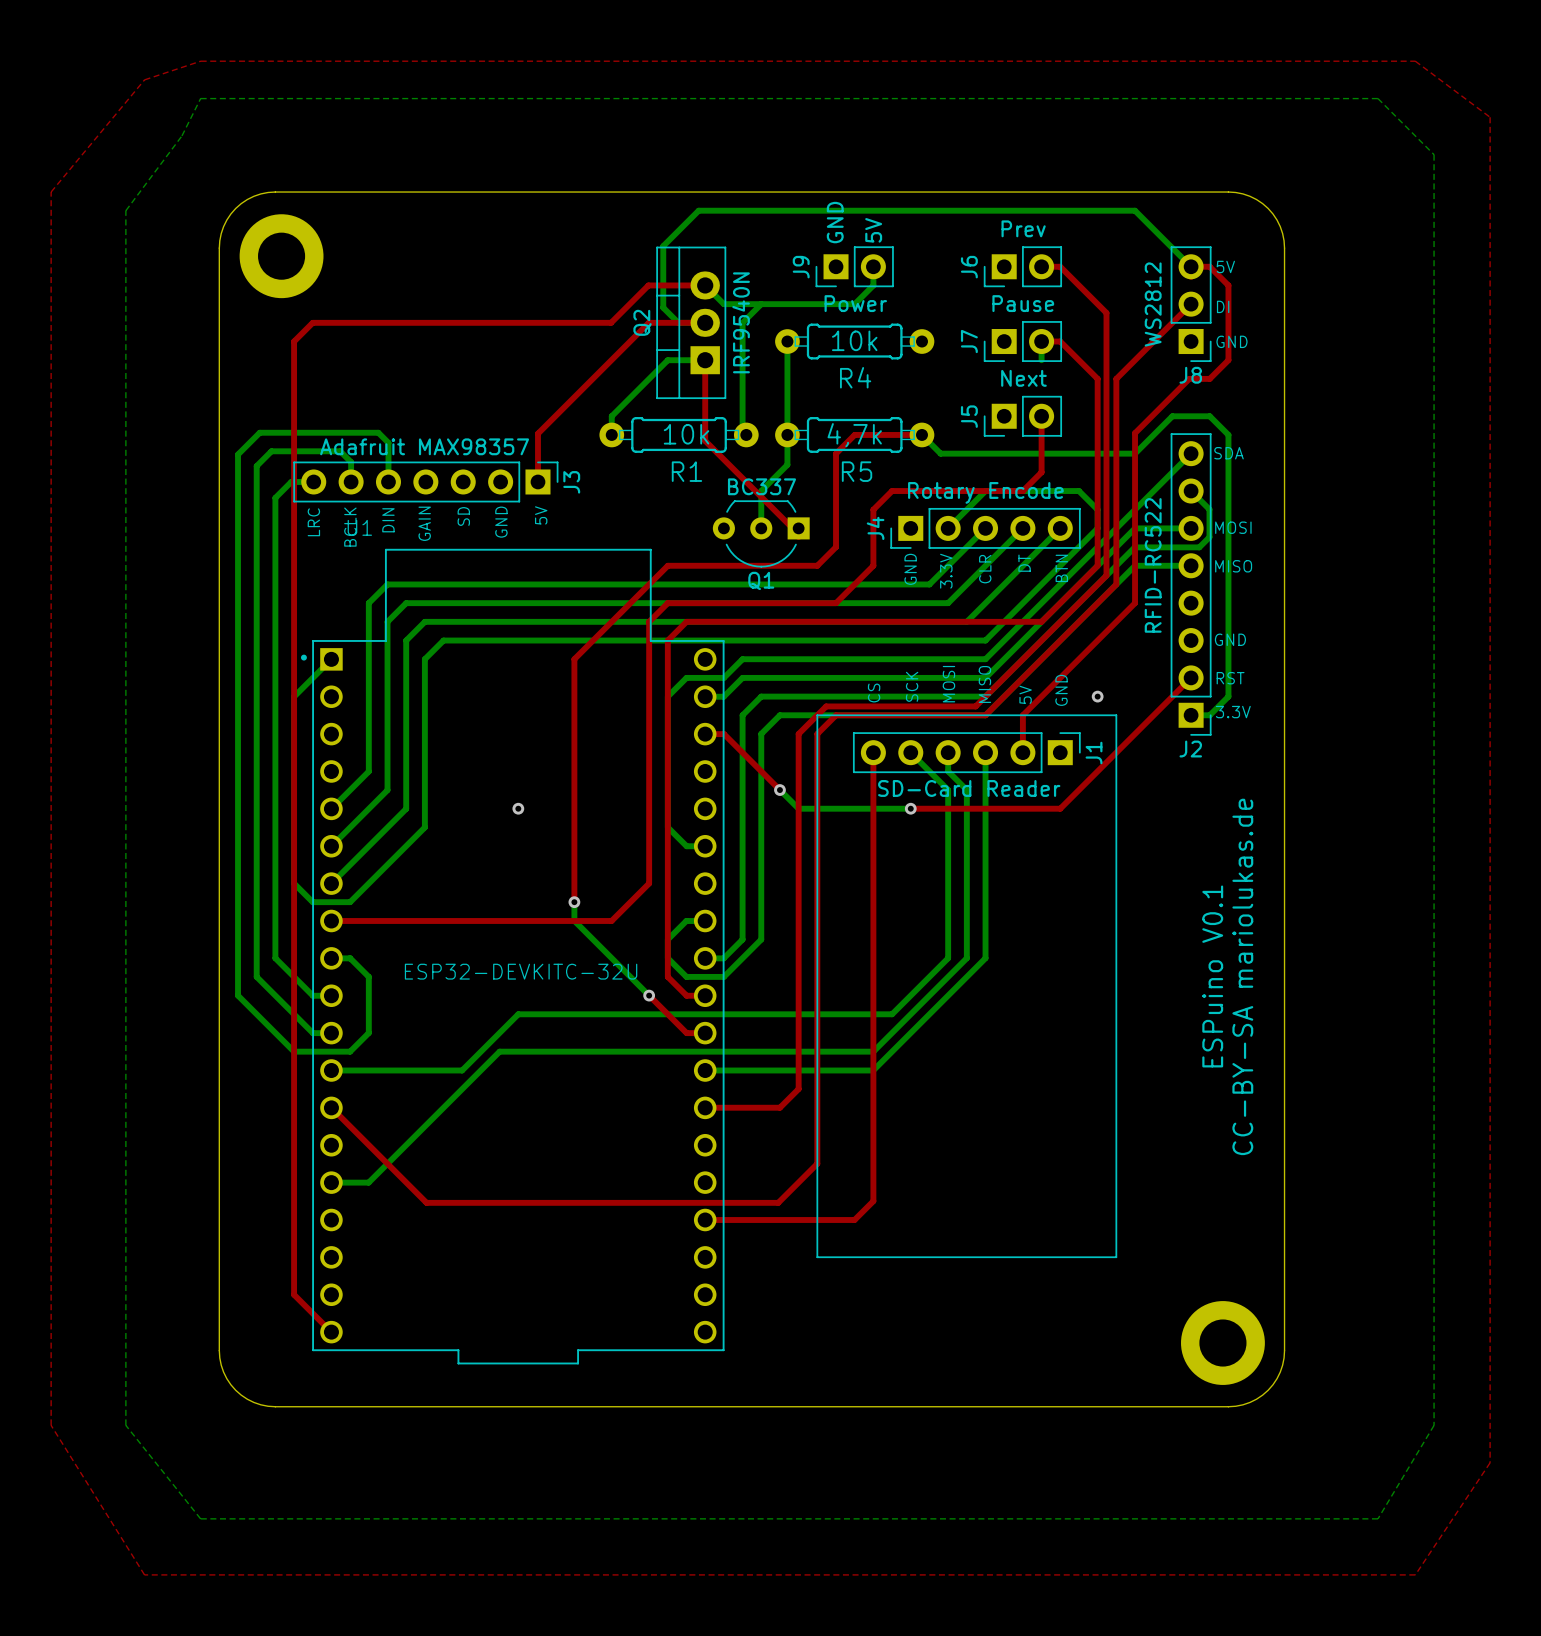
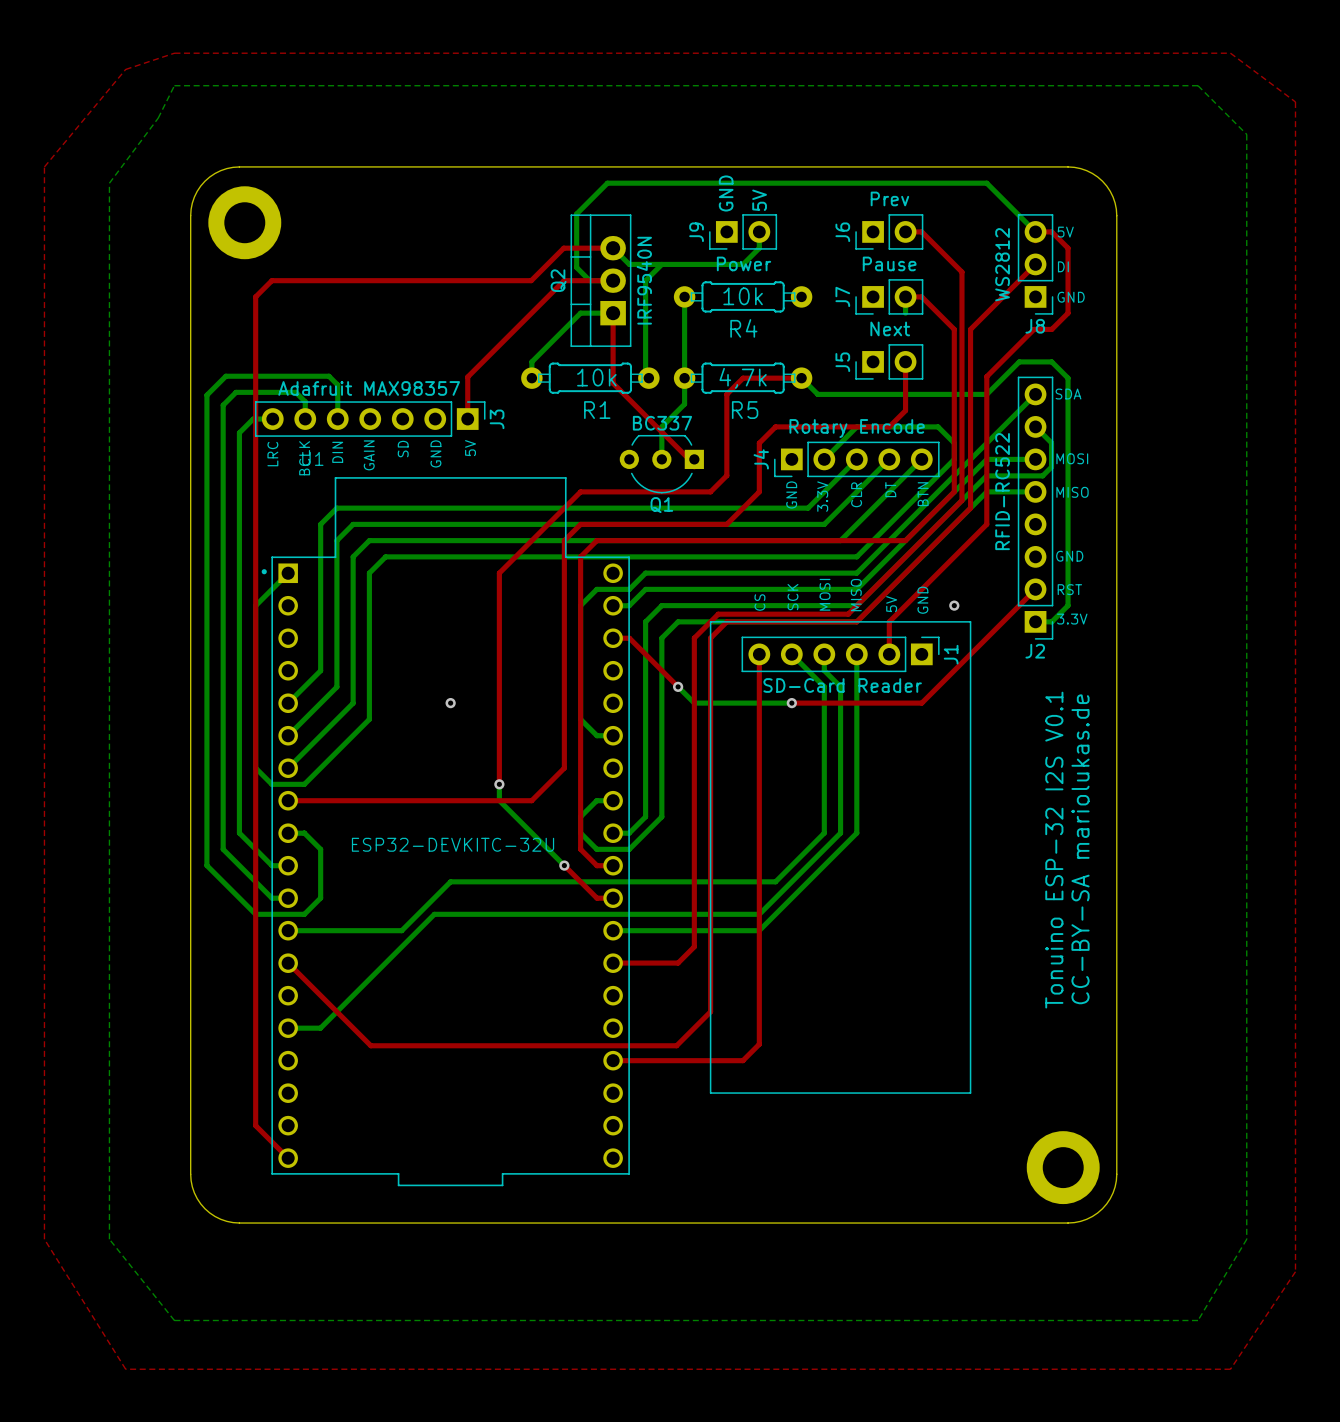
text: ESPuino V0.1 (1212, 976) -> Tonuino ESP-32 I2S V0.1 (1054, 850)

